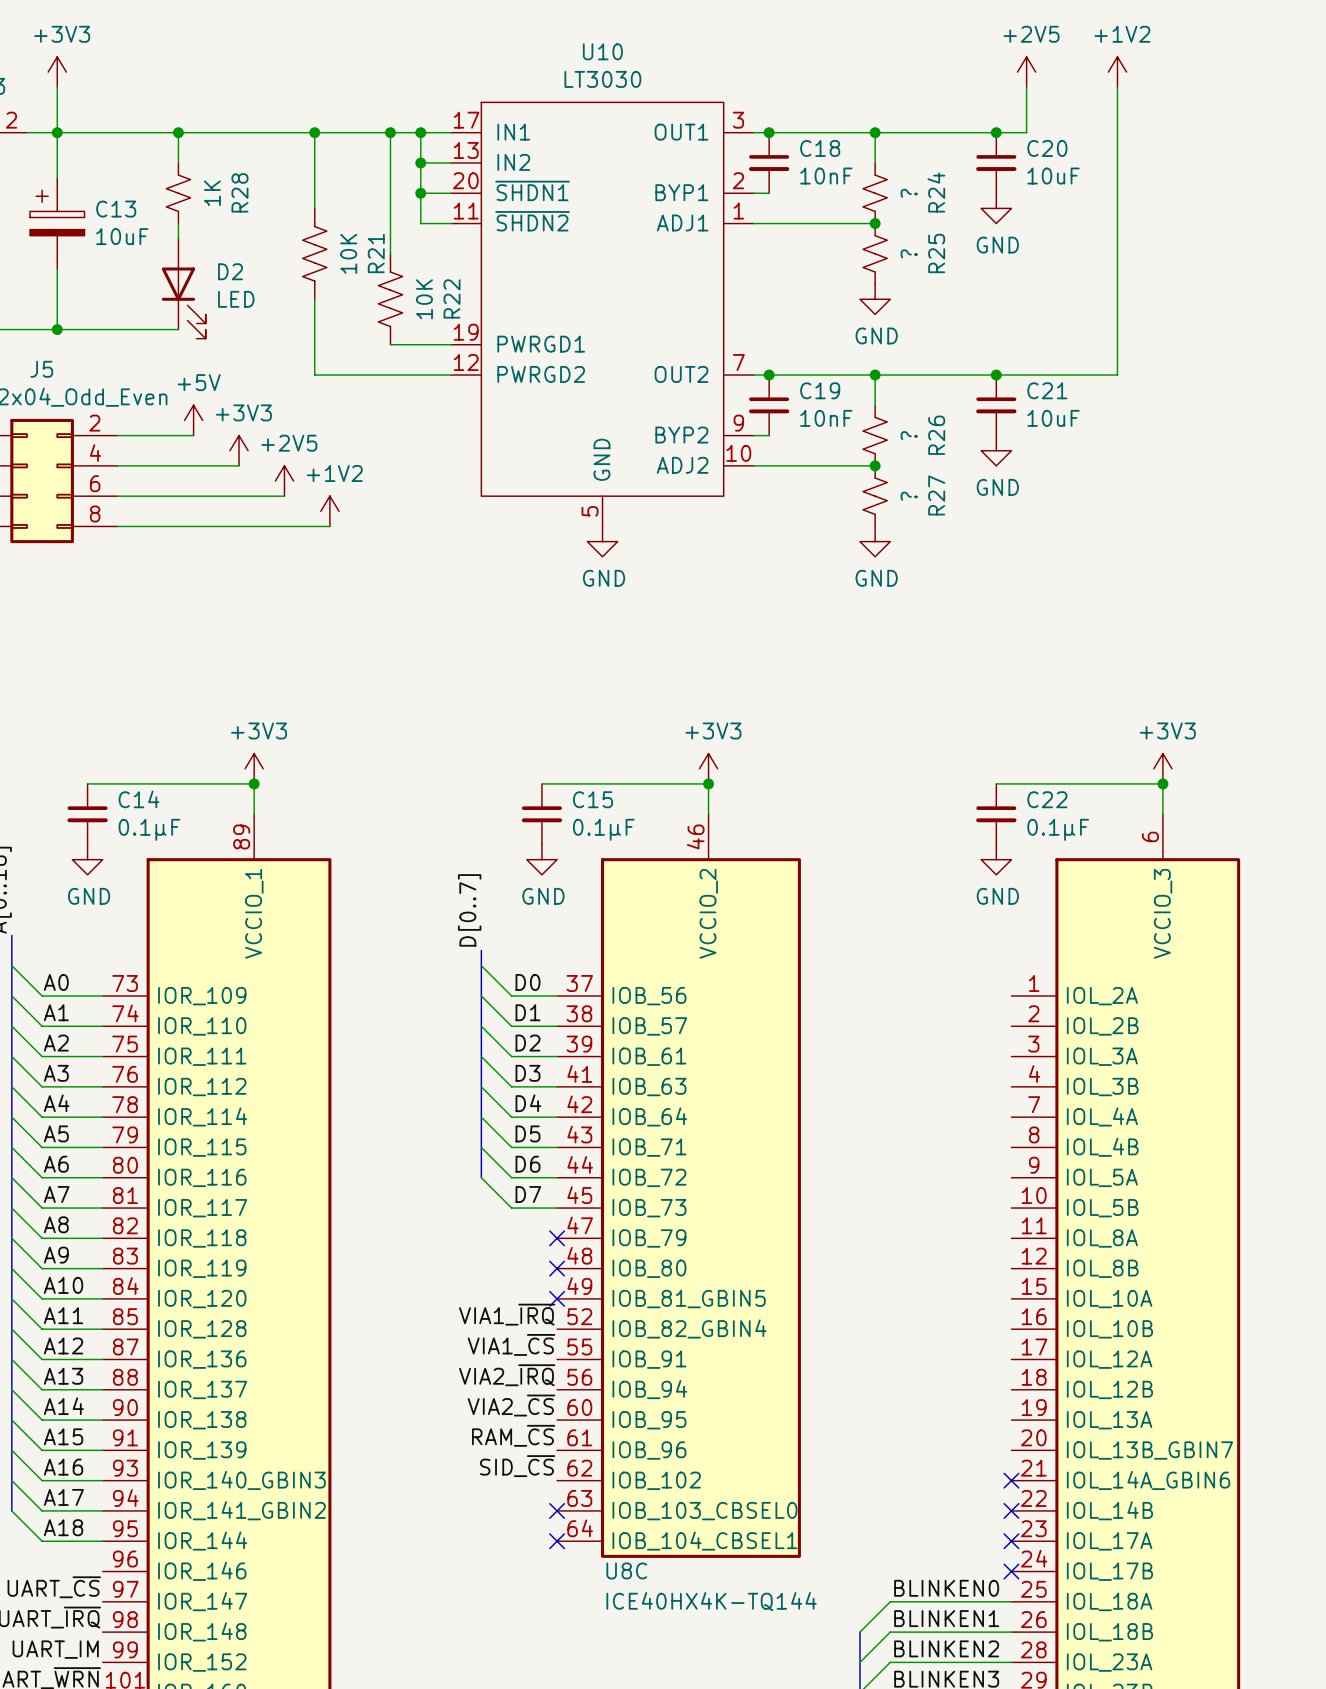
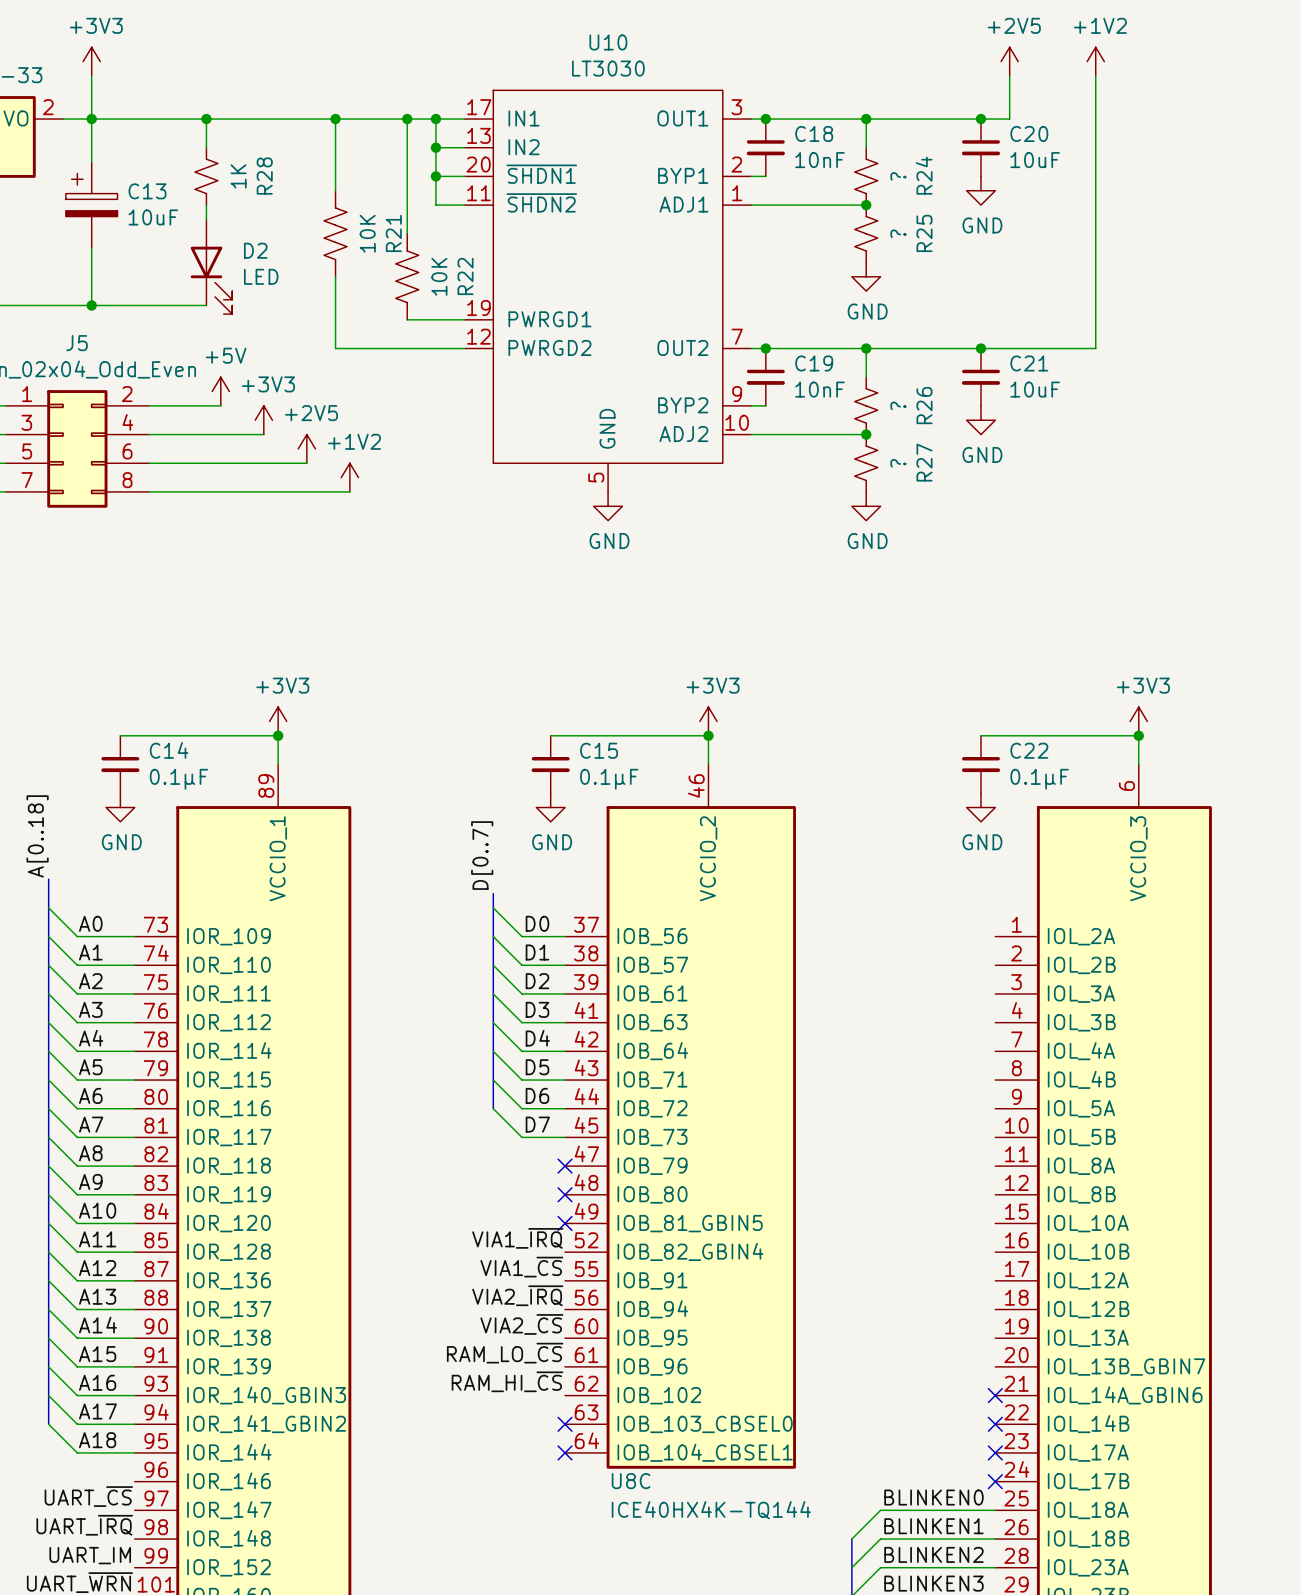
label: RAM_~{CS} (513, 1435) -> RAM_LO_~{CS} (505, 1353)
label: SID_~{CS} (517, 1466) -> RAM_HI_~{CS} (507, 1381)

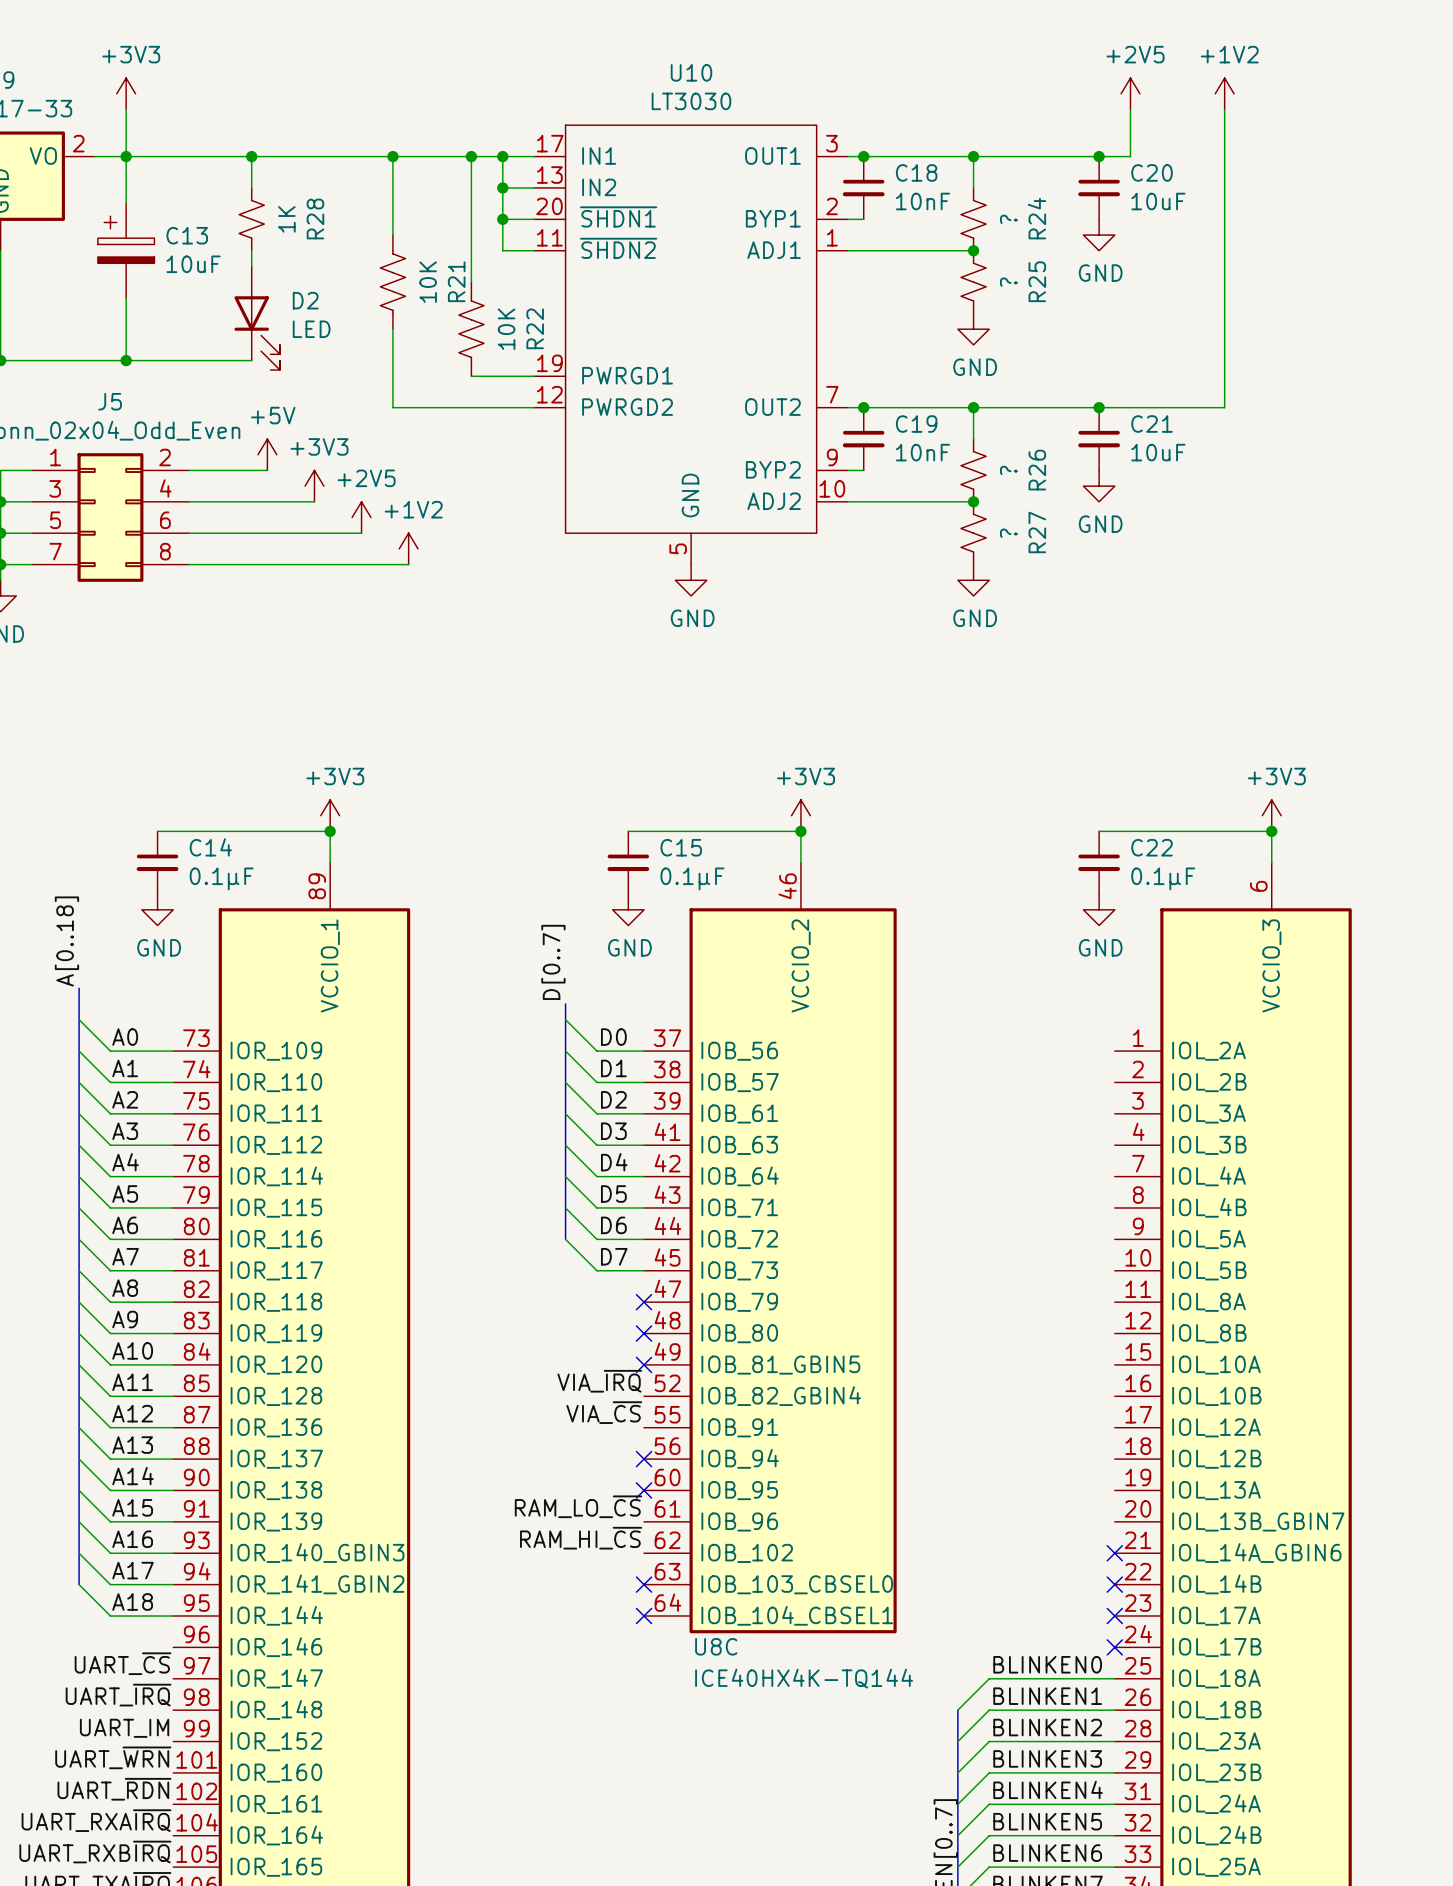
label: VIA1_~{IRQ} (517, 1238) -> VIA_~{IRQ} (599, 1381)
label: VIA1_~{CS} (521, 1267) -> VIA_~{CS} (604, 1412)
label: VIA2_~{IRQ} (517, 1295) -> none
no-connect mark: none -> (644, 1459)
label: VIA2_~{CS} (521, 1324) -> none
no-connect mark: none -> (644, 1490)

